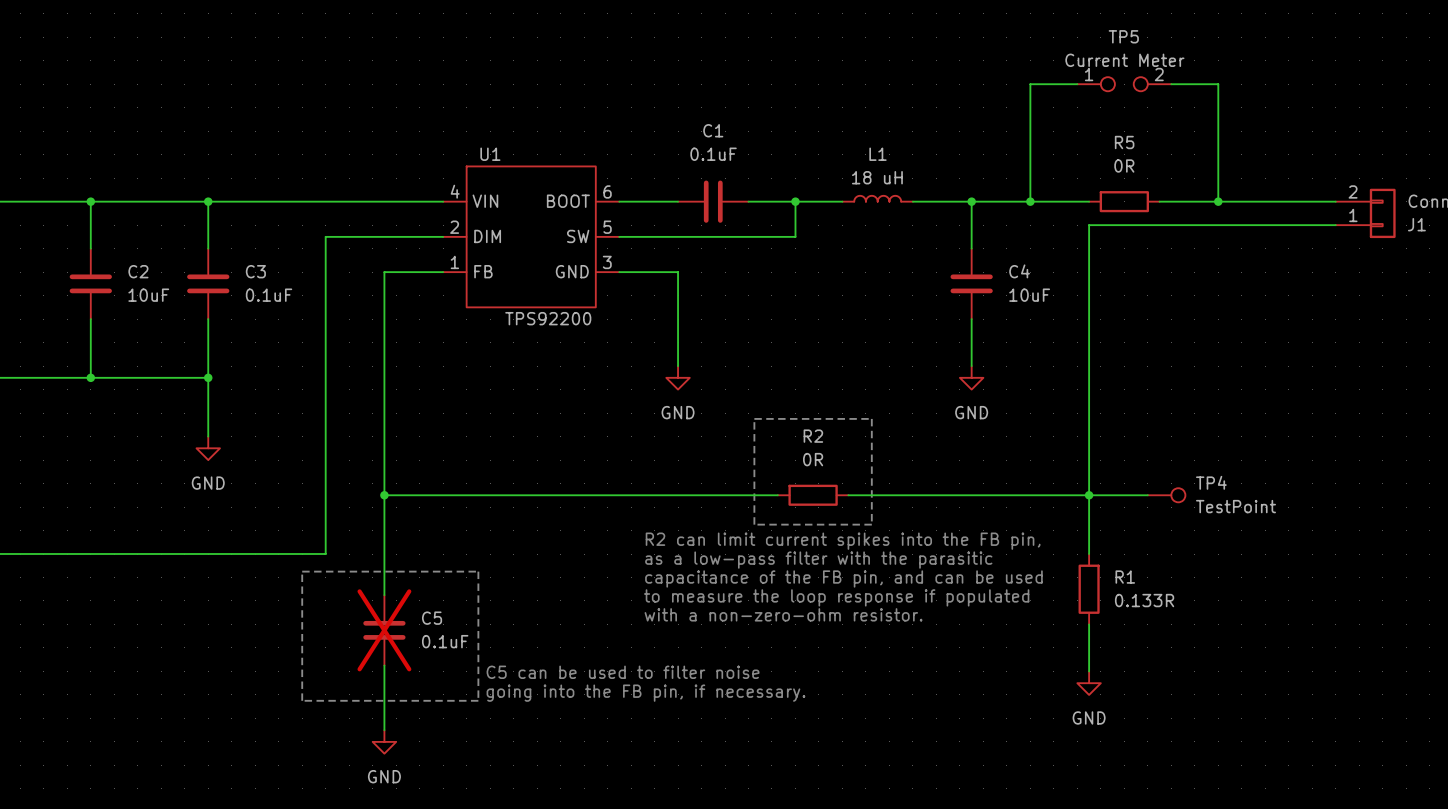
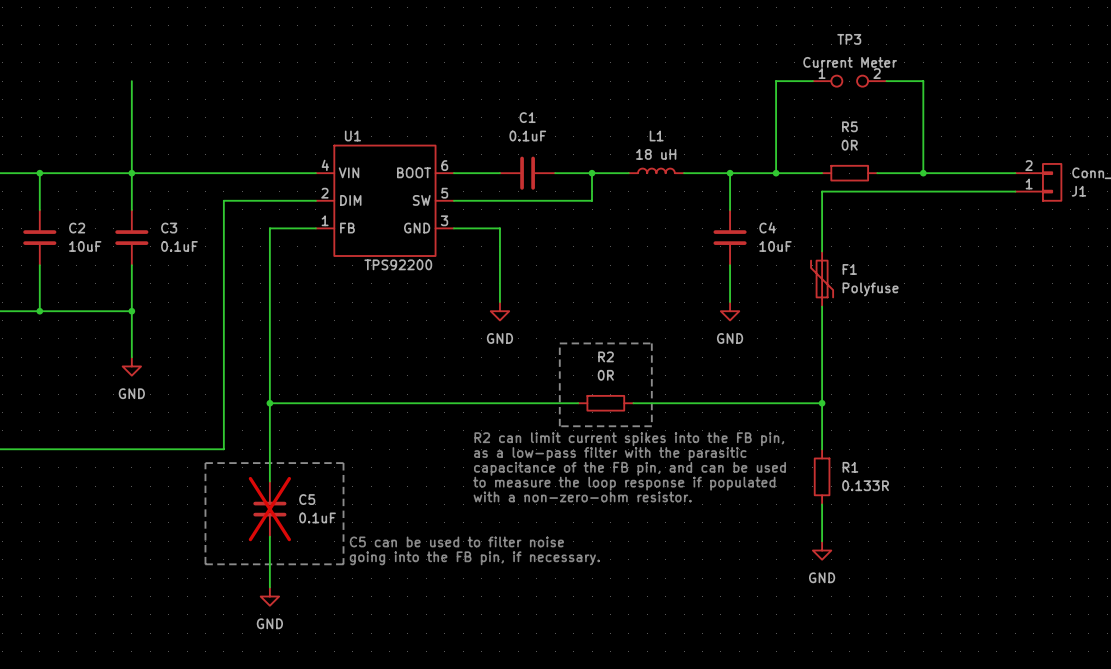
TP5 name: TP5 (1123, 36) -> TP3 (849, 39)
wire: none -> (131, 81) (131, 173)
F1: none -> Polyfuse (822, 279)
wire: (1089, 495) (1147, 495) -> none
TP4: TestPoint (1166, 495) -> none

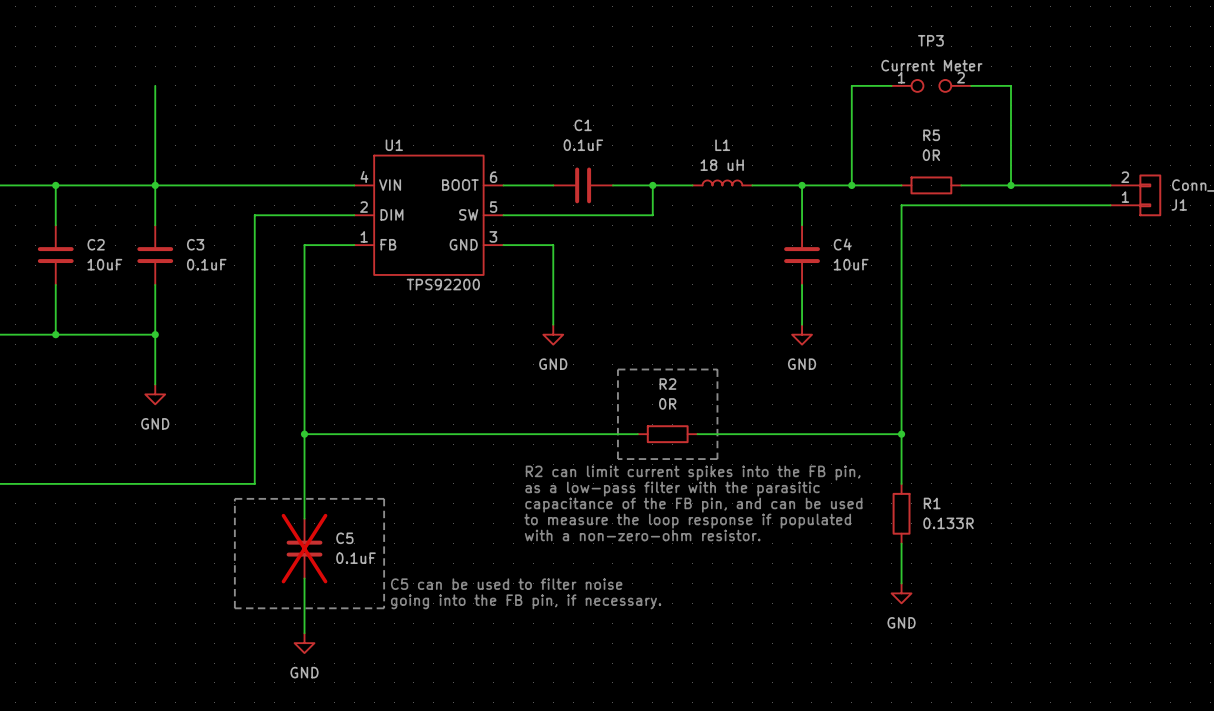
F1: Polyfuse (822, 279) -> none

